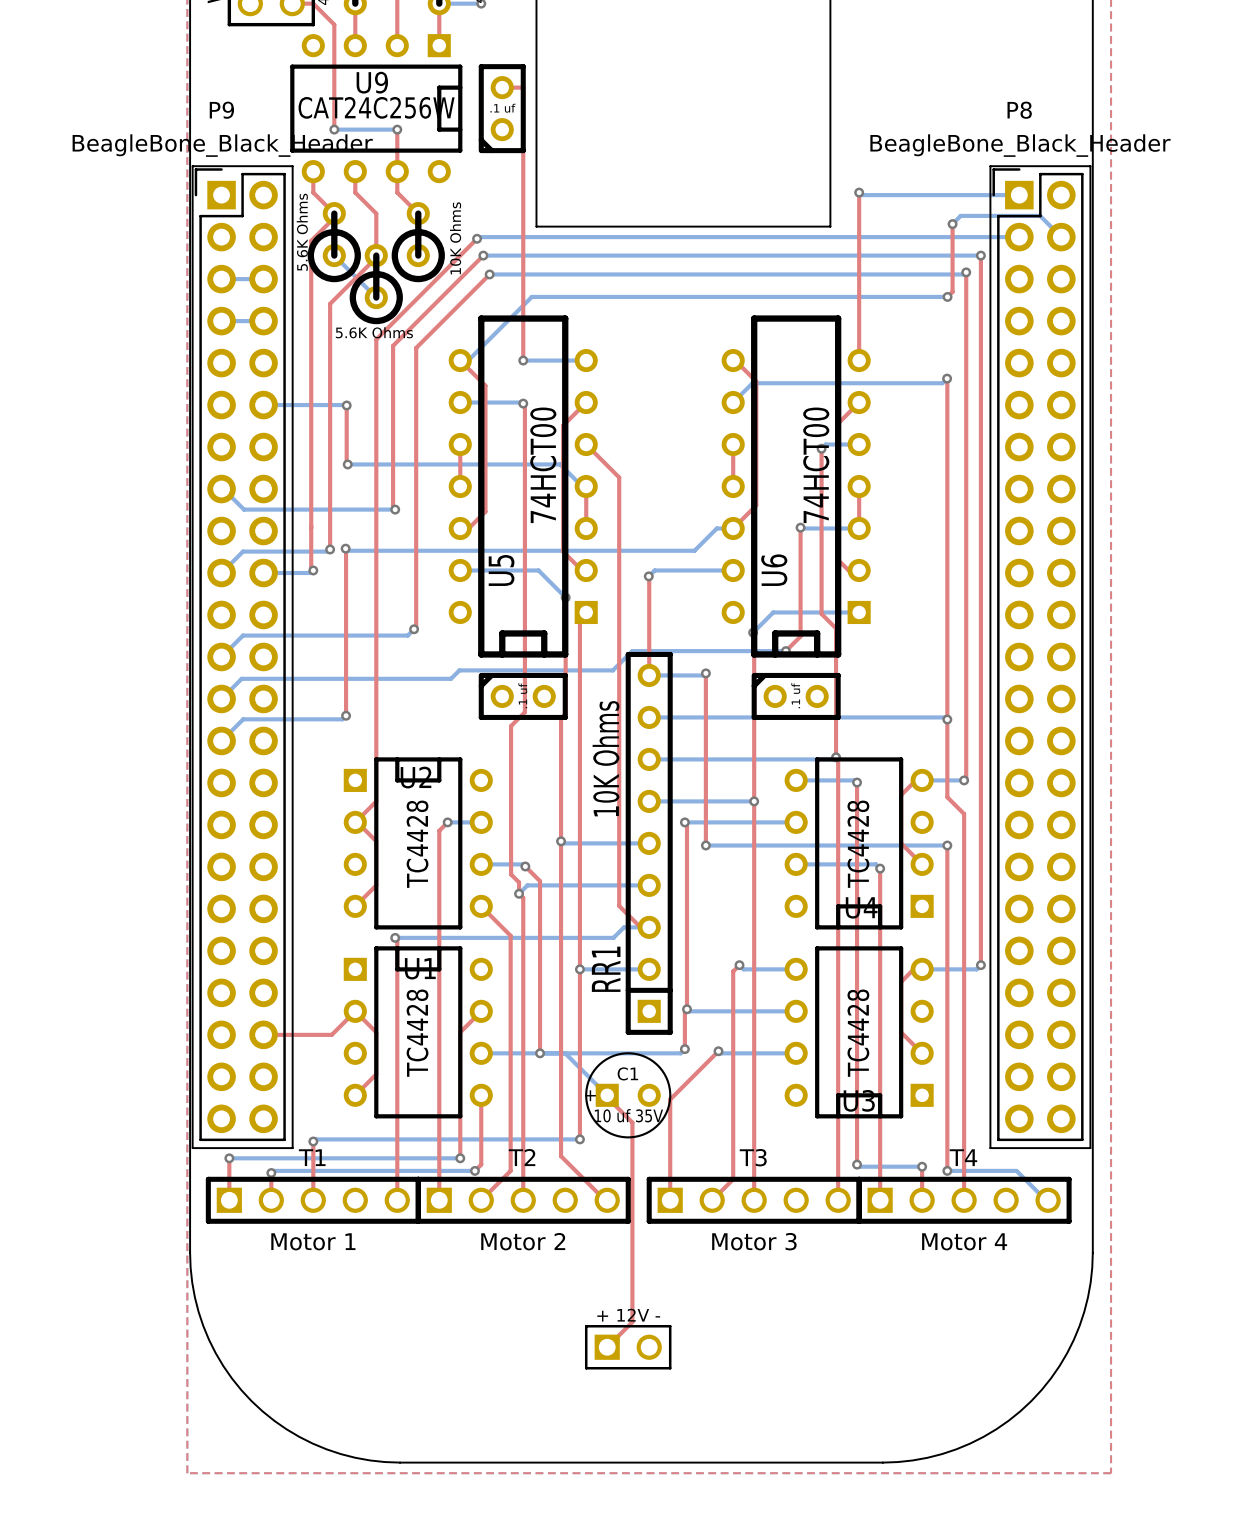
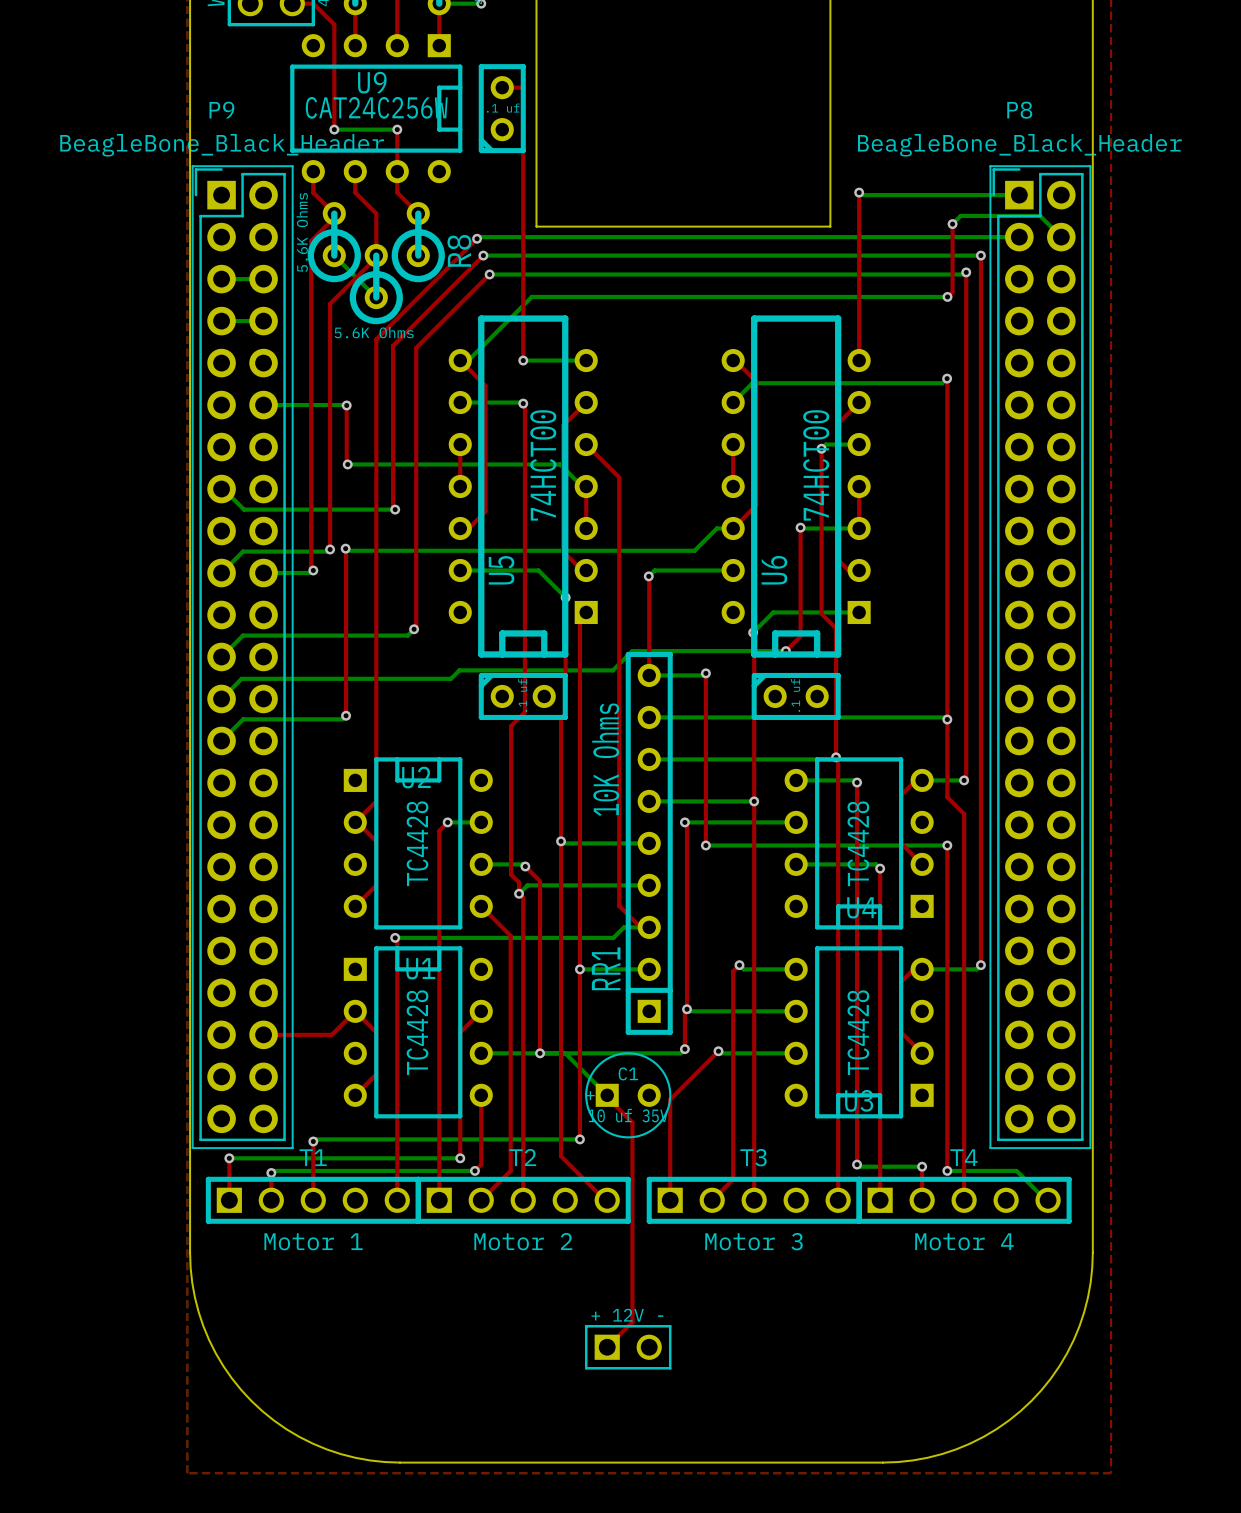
R8 value: 10K Ohms (455, 238) -> none
R8 name: none -> R8 (459, 250)

